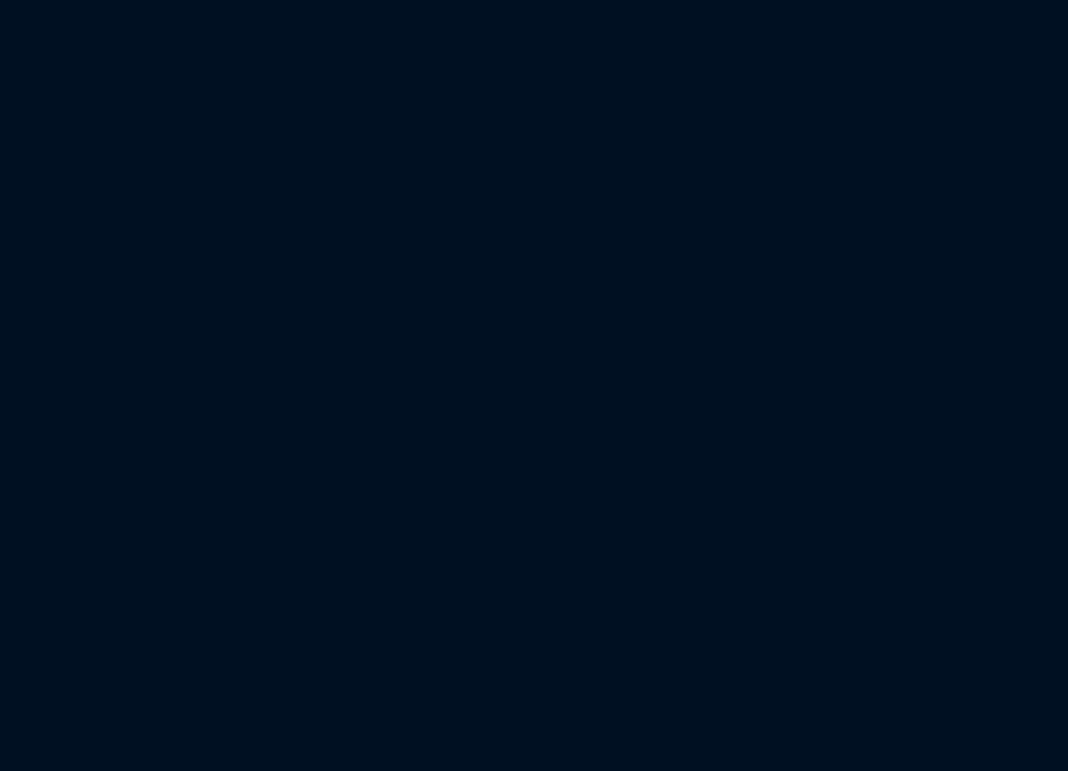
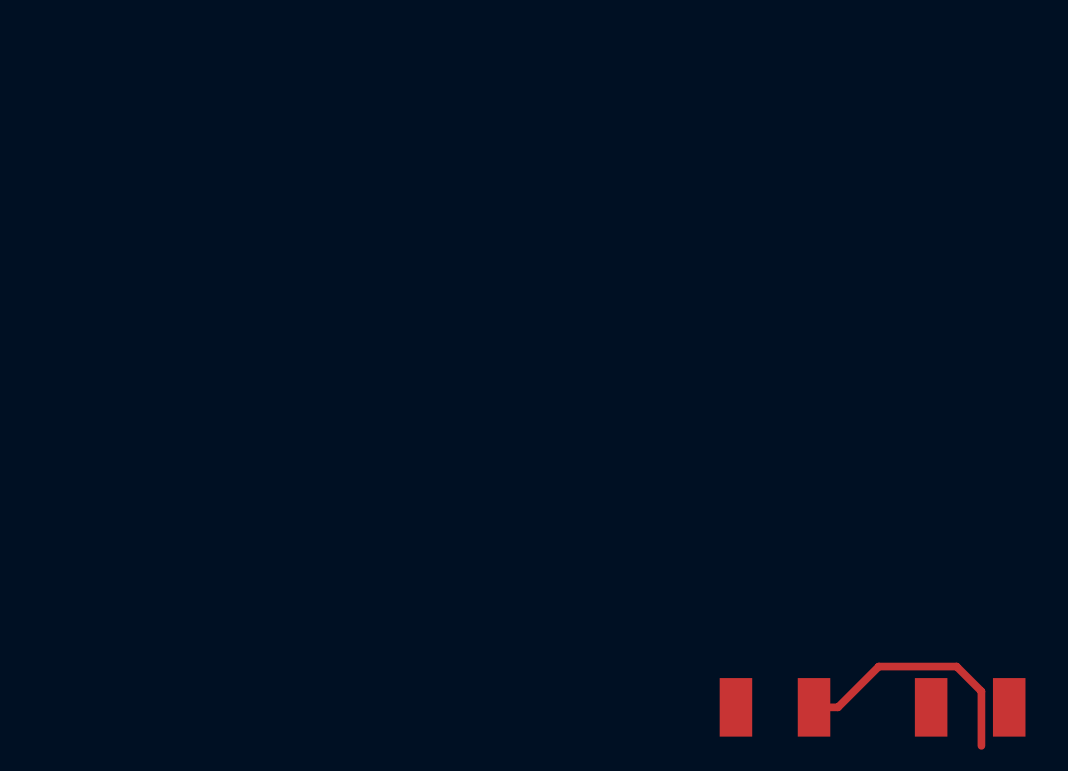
part: none -> (774, 707)
top track: none -> (814, 707) (837, 707) (878, 666) (956, 666) (981, 691) (981, 745)
part: none -> (970, 707)

